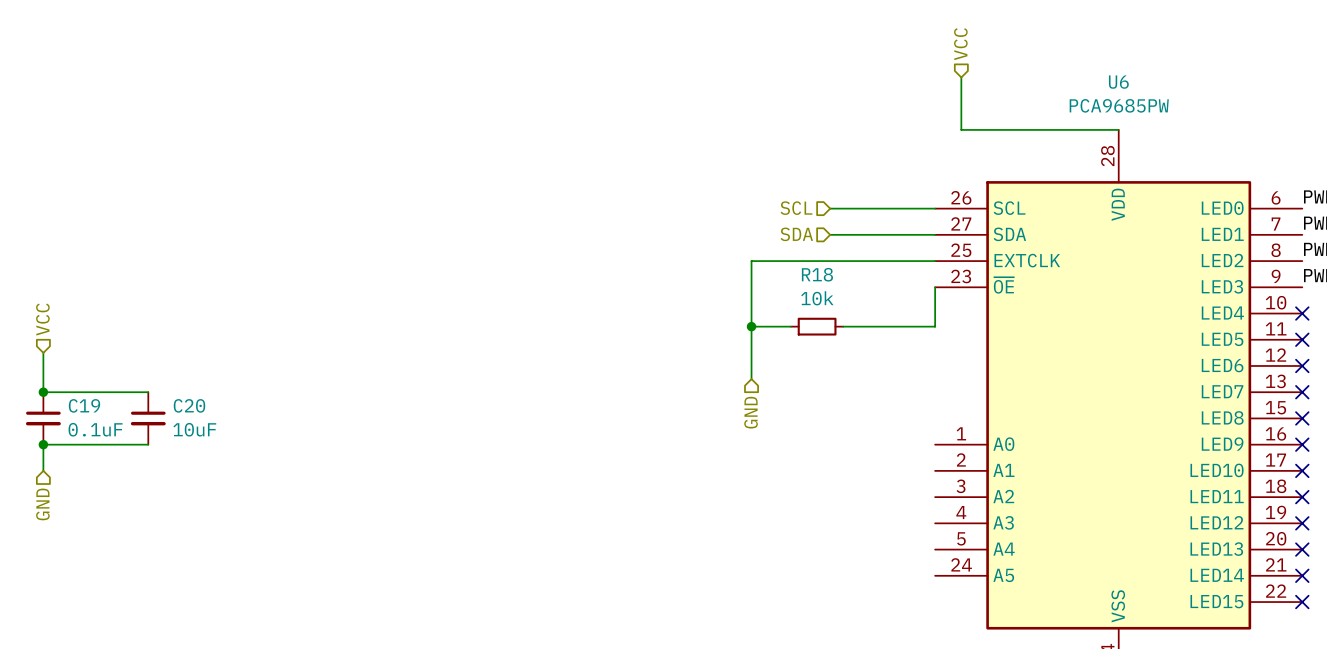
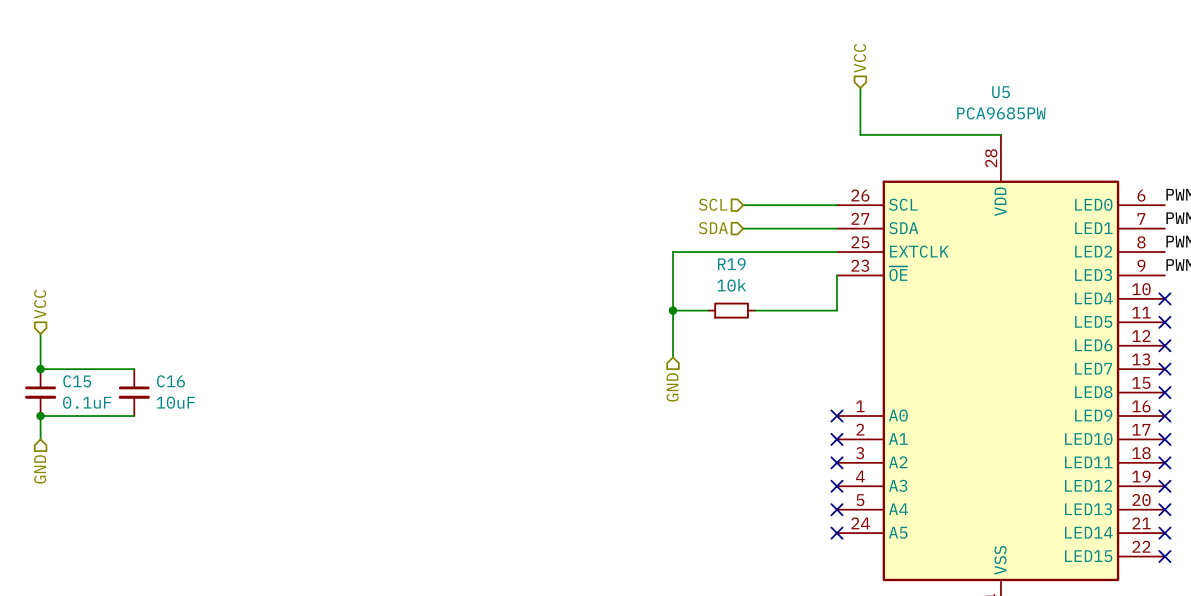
U6 name: U6 (1118, 82) -> U5 (1001, 92)
R18 name: R18 (817, 274) -> R19 (731, 264)
C19 name: C19 (84, 405) -> C15 (77, 381)
C20 name: C20 (189, 405) -> C16 (170, 381)
no-connect mark: none -> (836, 416)
no-connect mark: none -> (836, 439)
no-connect mark: none -> (836, 462)
no-connect mark: none -> (836, 486)
no-connect mark: none -> (836, 509)
no-connect mark: none -> (836, 533)

